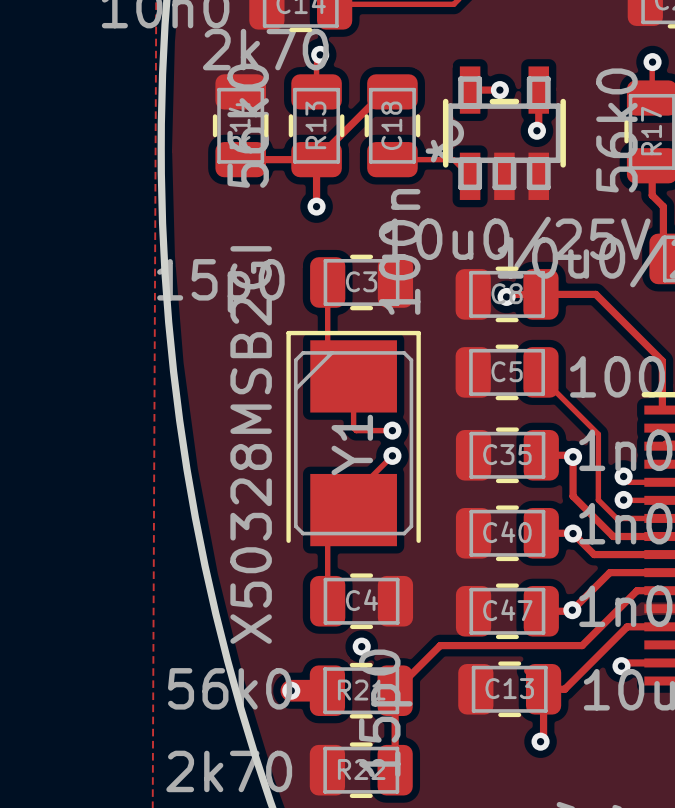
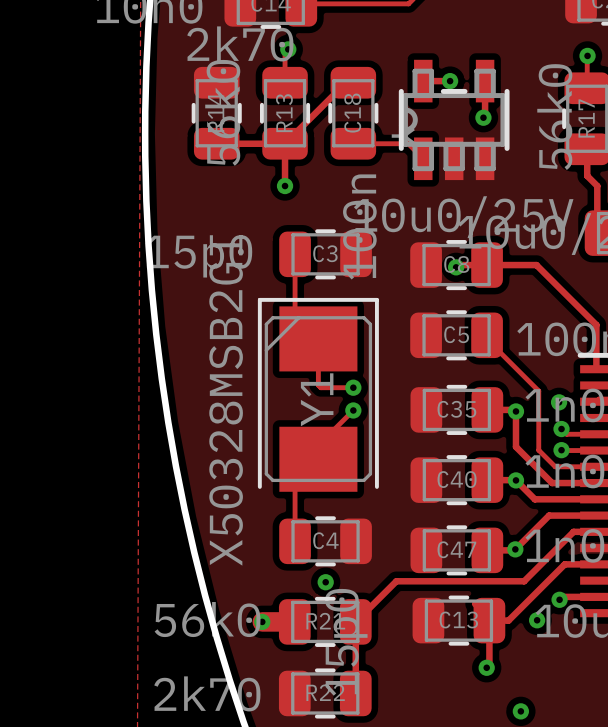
via: none -> (559, 402)
via: none -> (537, 620)
via: none -> (520, 711)

